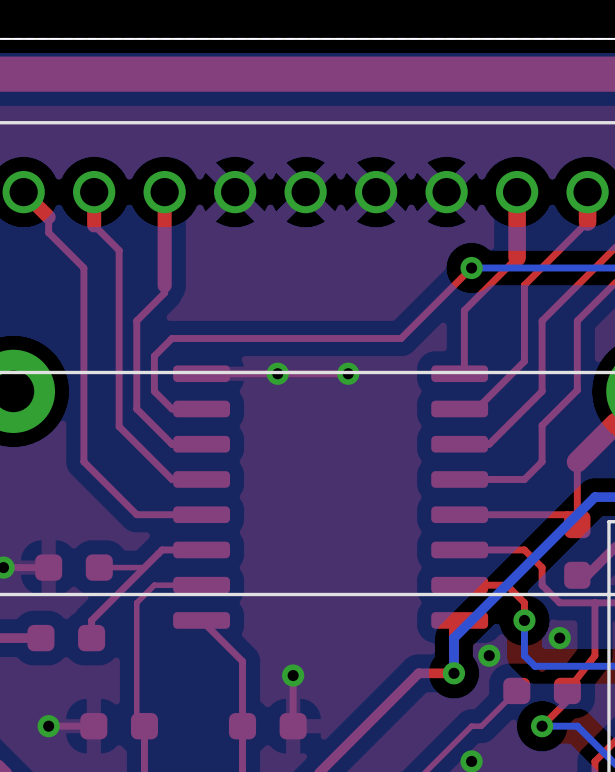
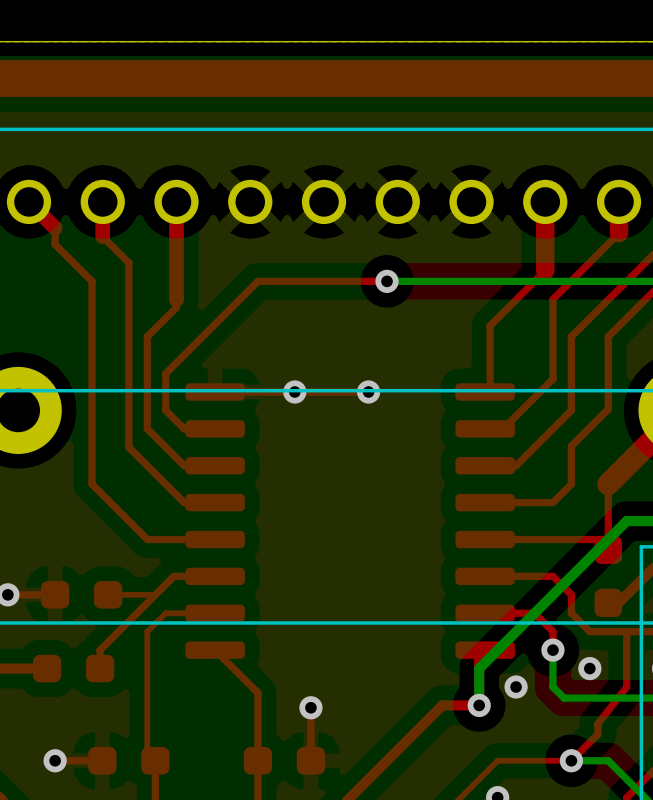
top track: (471, 268) (401, 338) (172, 338) -> (387, 281) (257, 281) (184, 355)
bottom track: none -> (497, 281) (387, 281)
via position: (471, 268) -> (387, 281)
top track: (516, 690) (481, 726) -> (571, 760) (508, 760)
part: (542, 690) -> none

